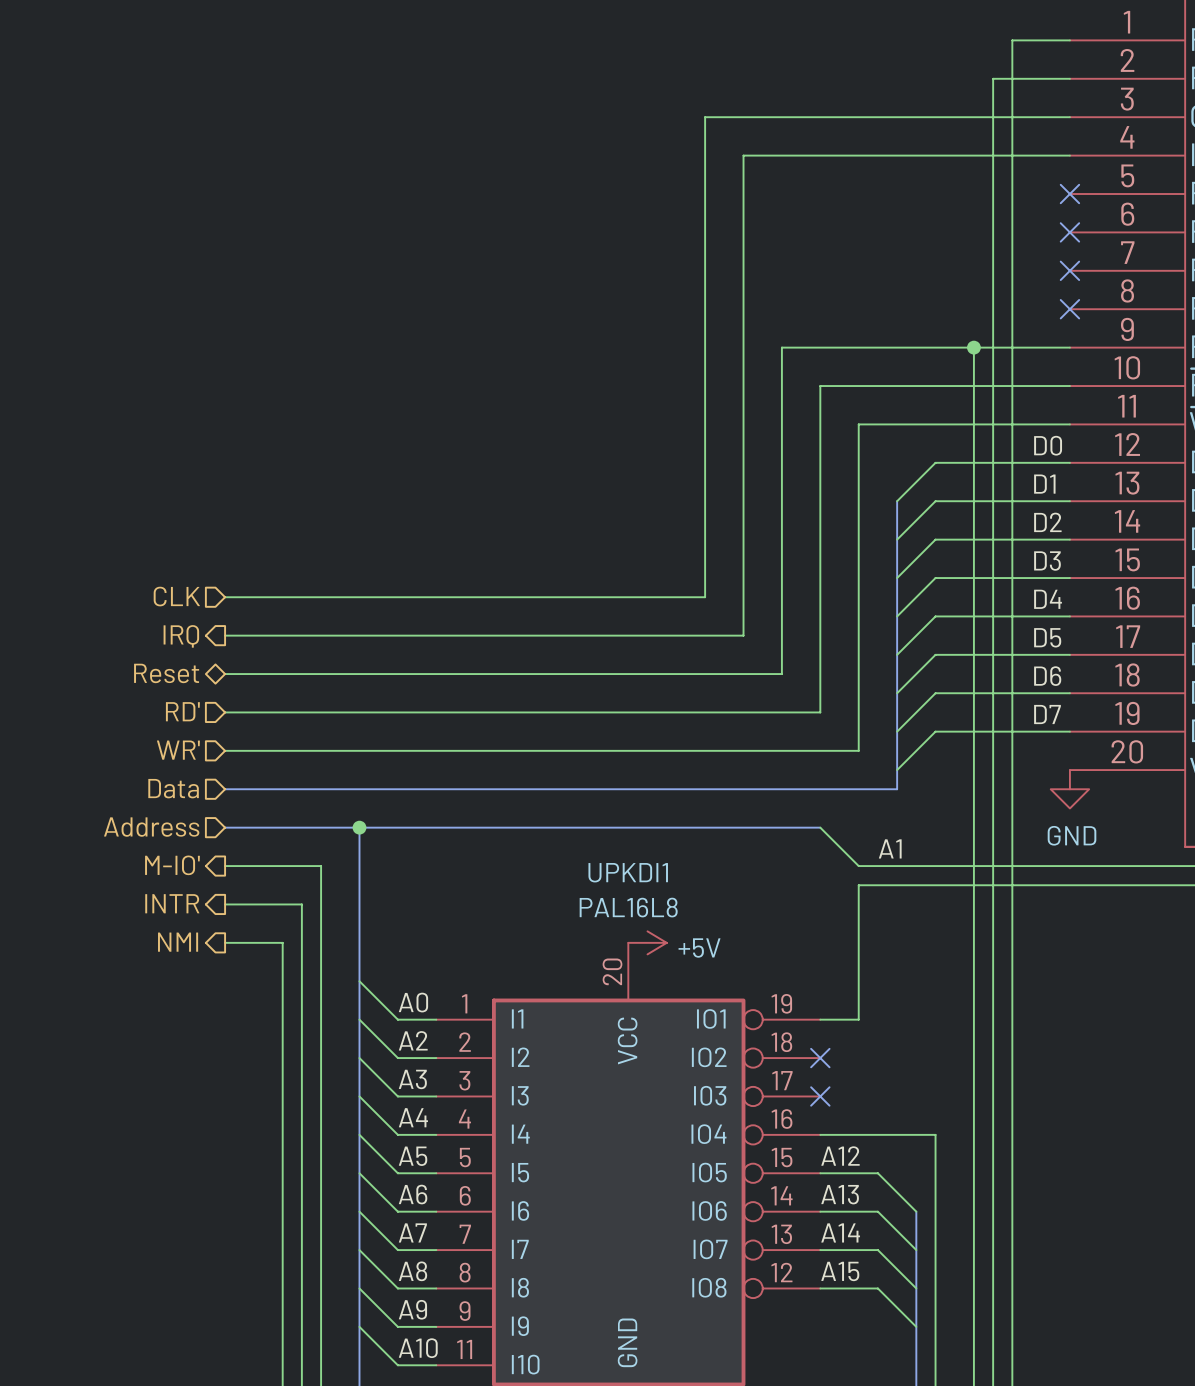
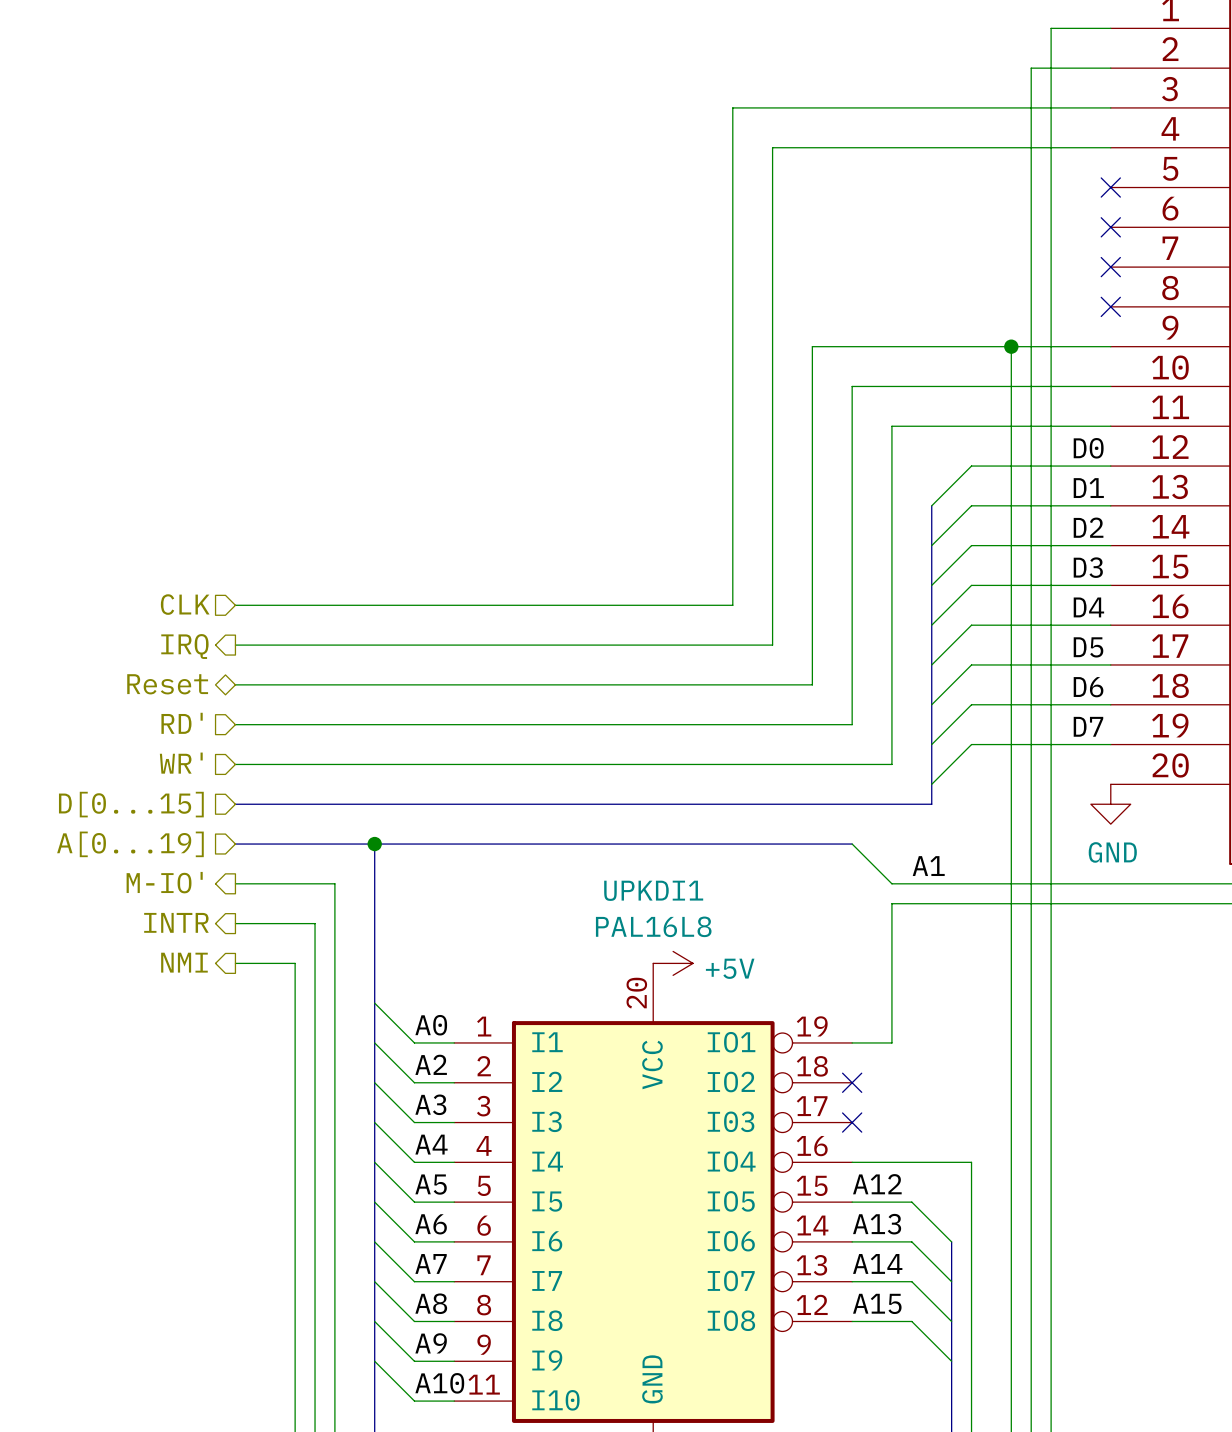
hierarchical label: Data (173, 788) -> D[0...15] (131, 804)
hierarchical label: Address (151, 827) -> A[0...19] (130, 844)

